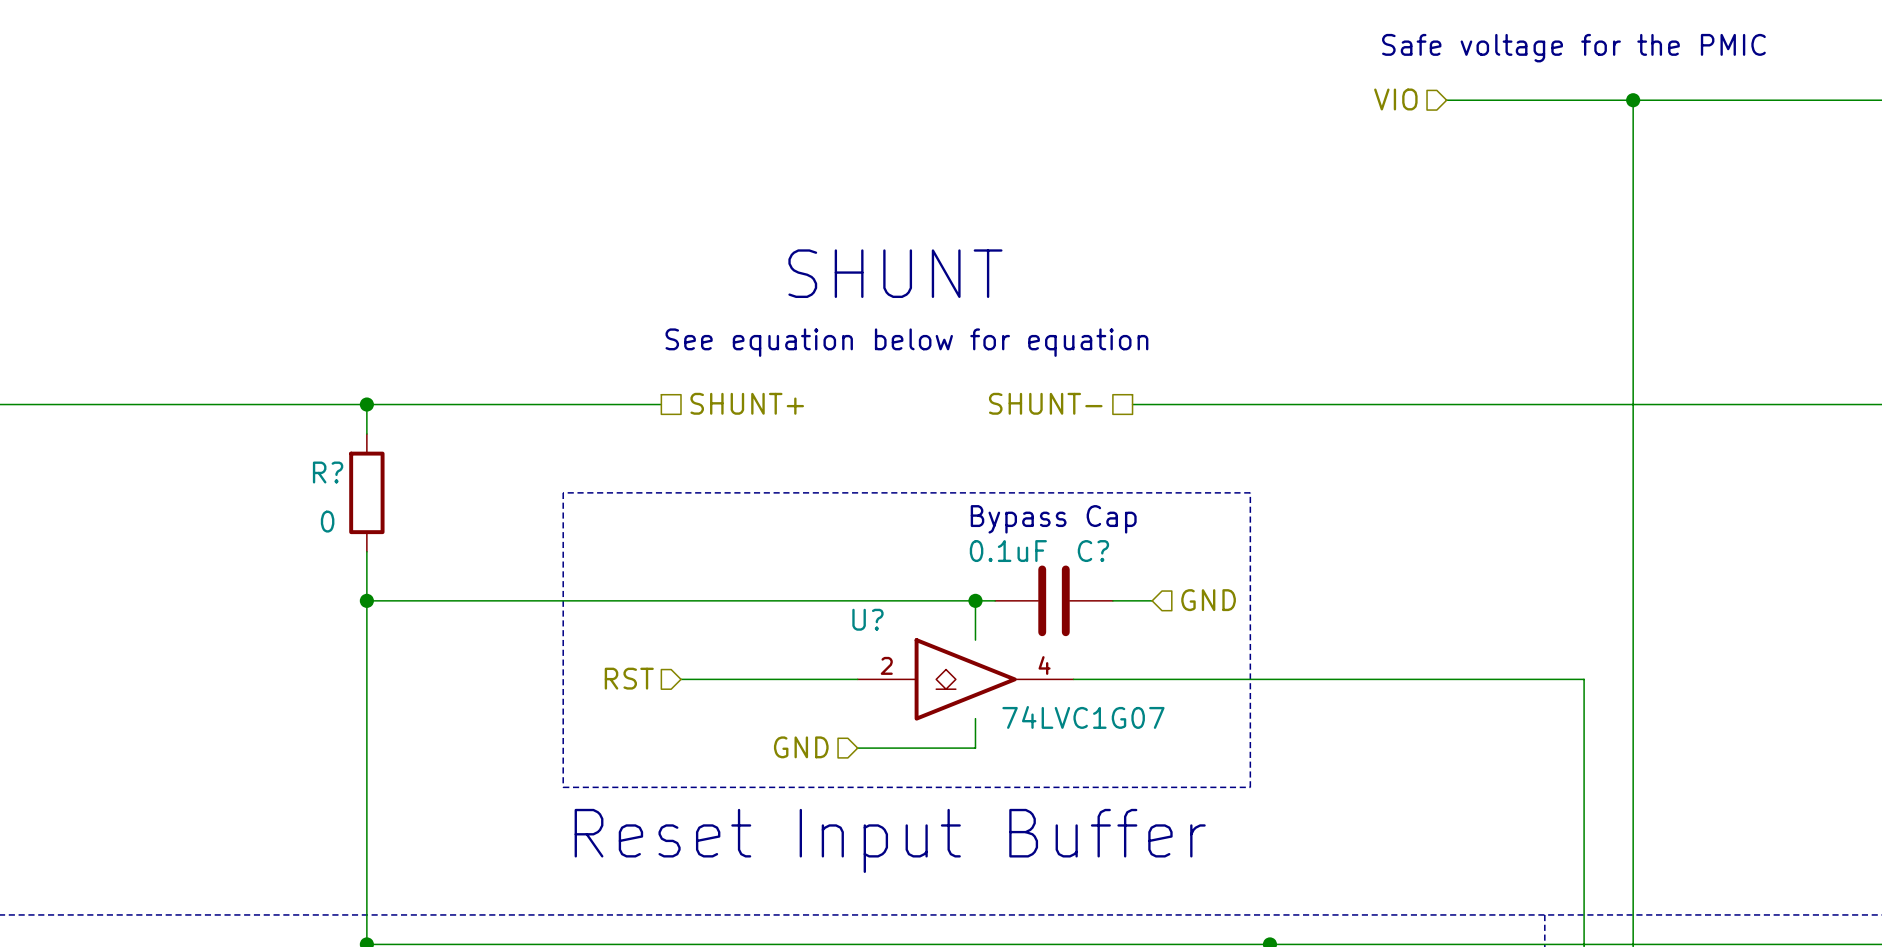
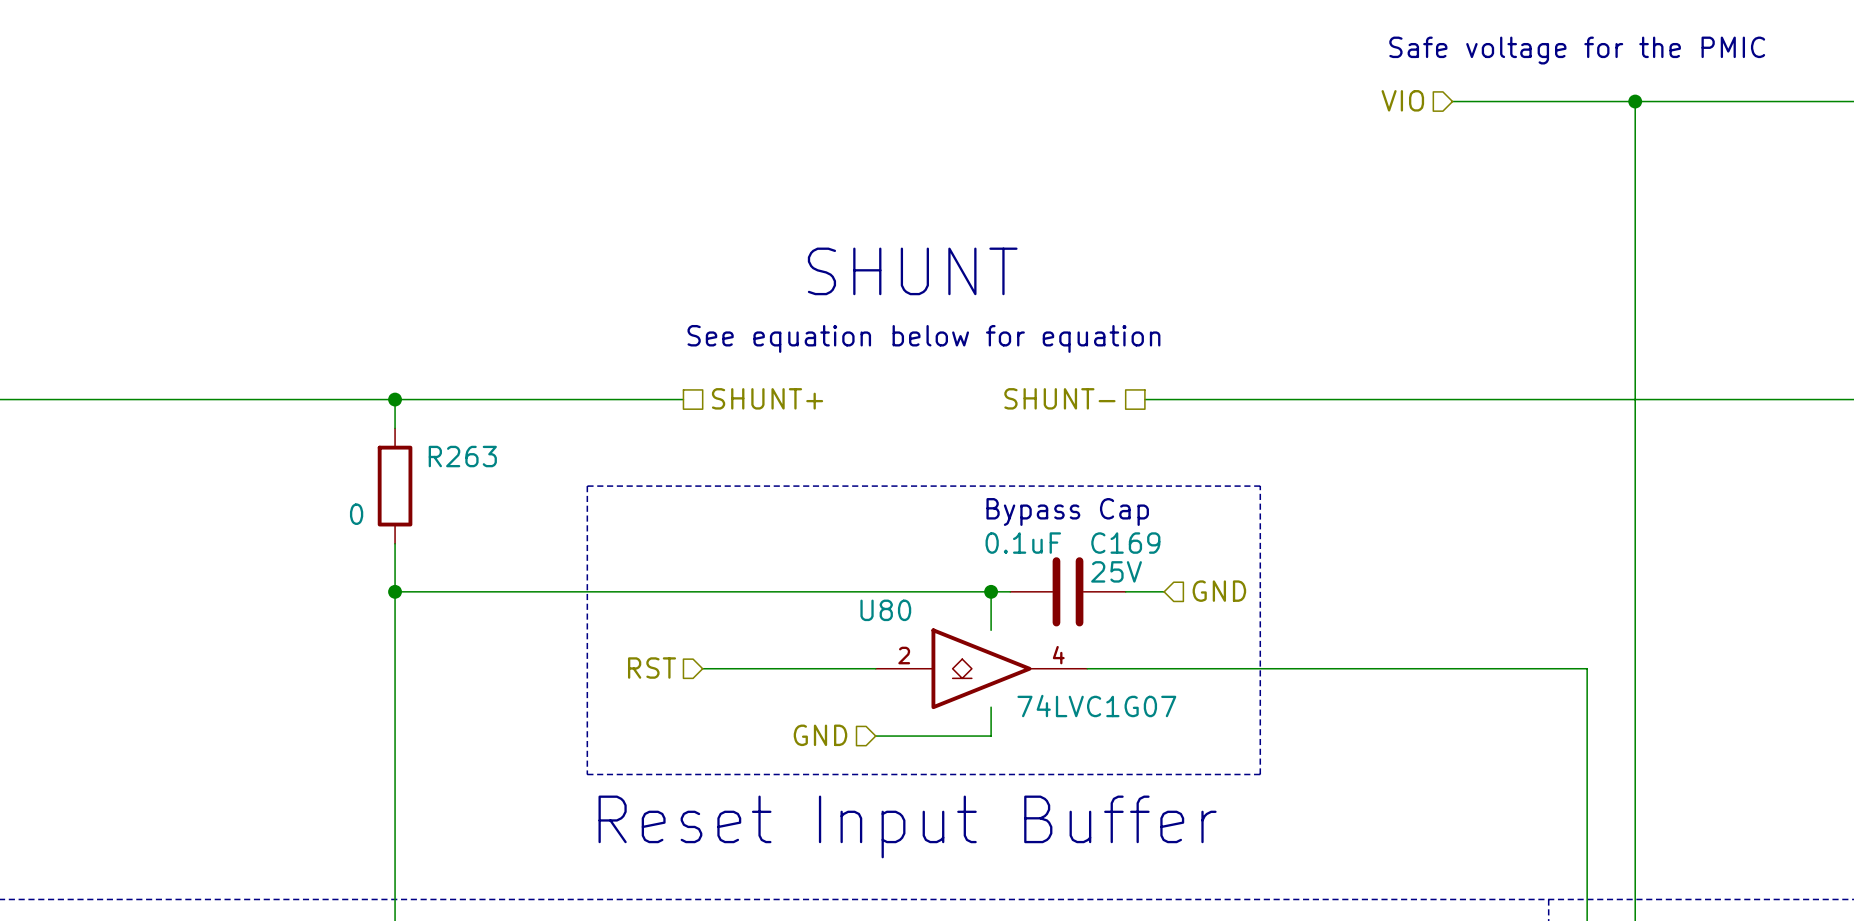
R? name: R? (328, 472) -> R263 (462, 456)
C? name: C? (1093, 551) -> C169 (1125, 543)
C? text: none -> 25V (1116, 571)
U? name: U? (867, 619) -> U80 (885, 610)

